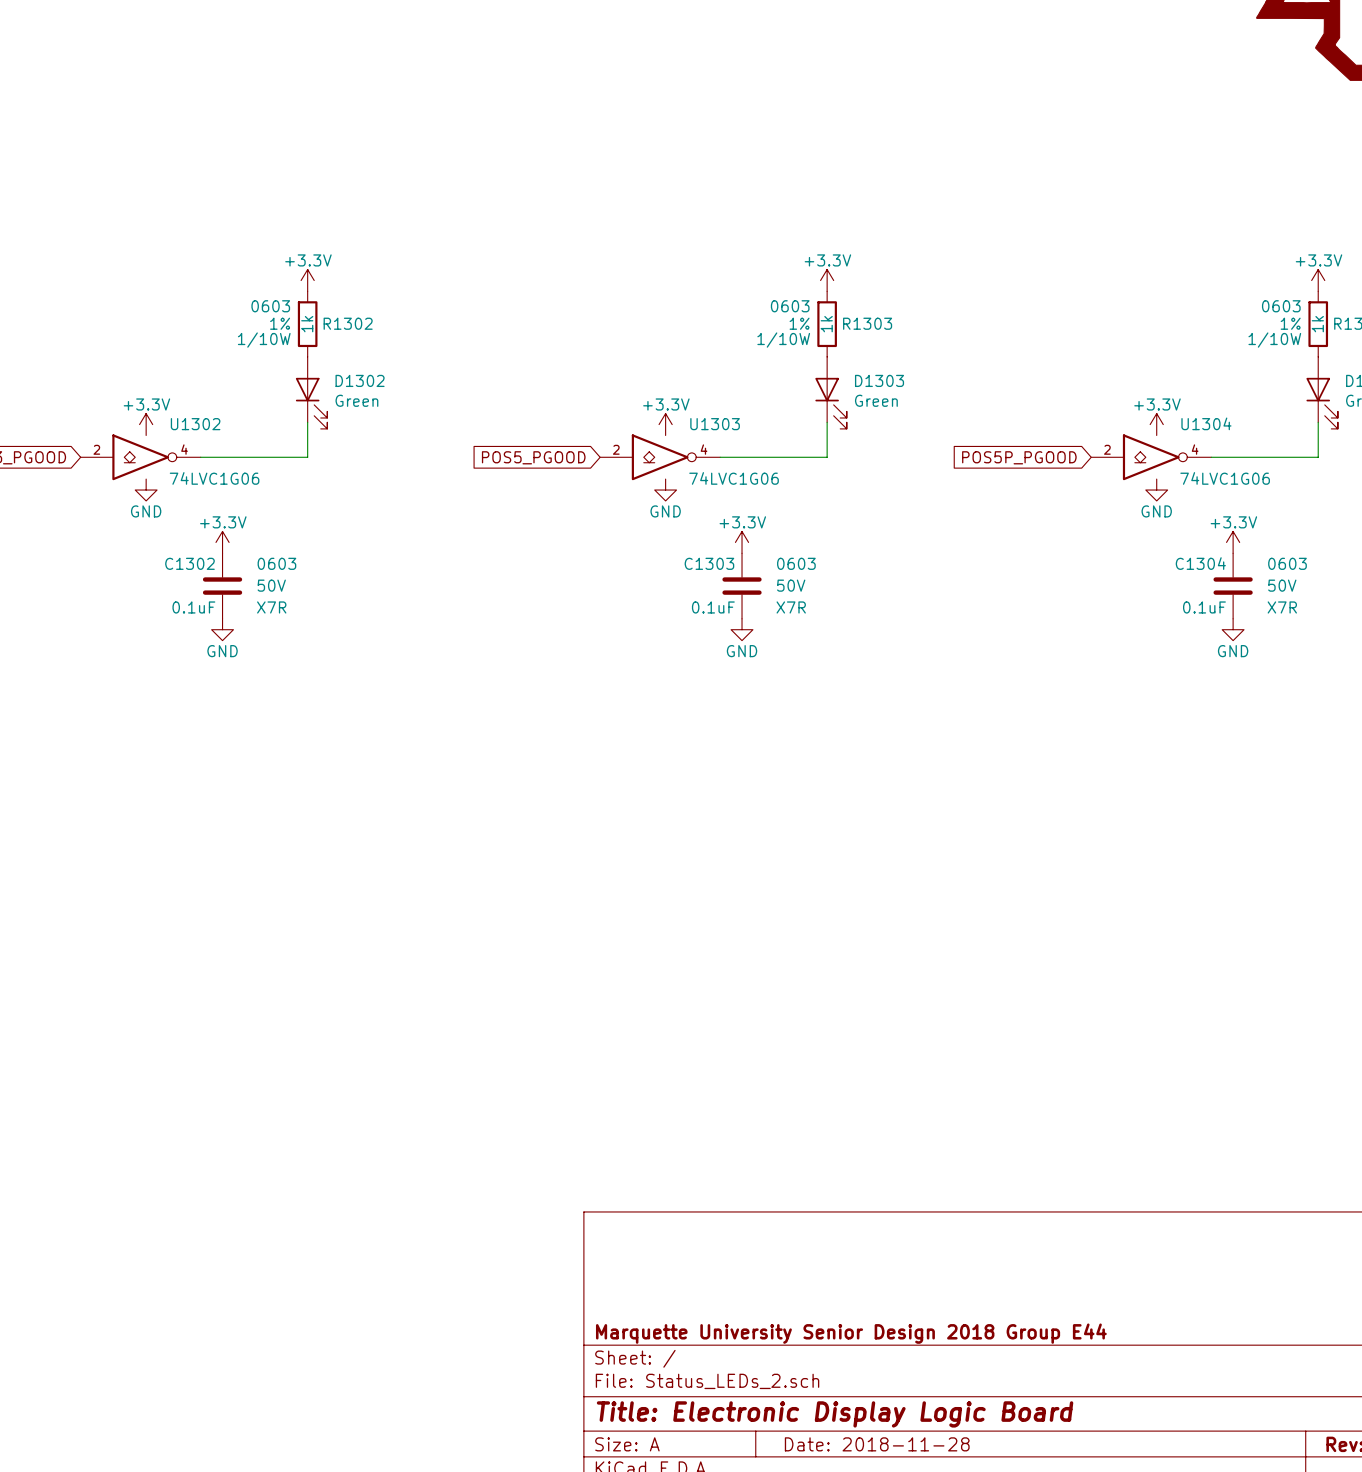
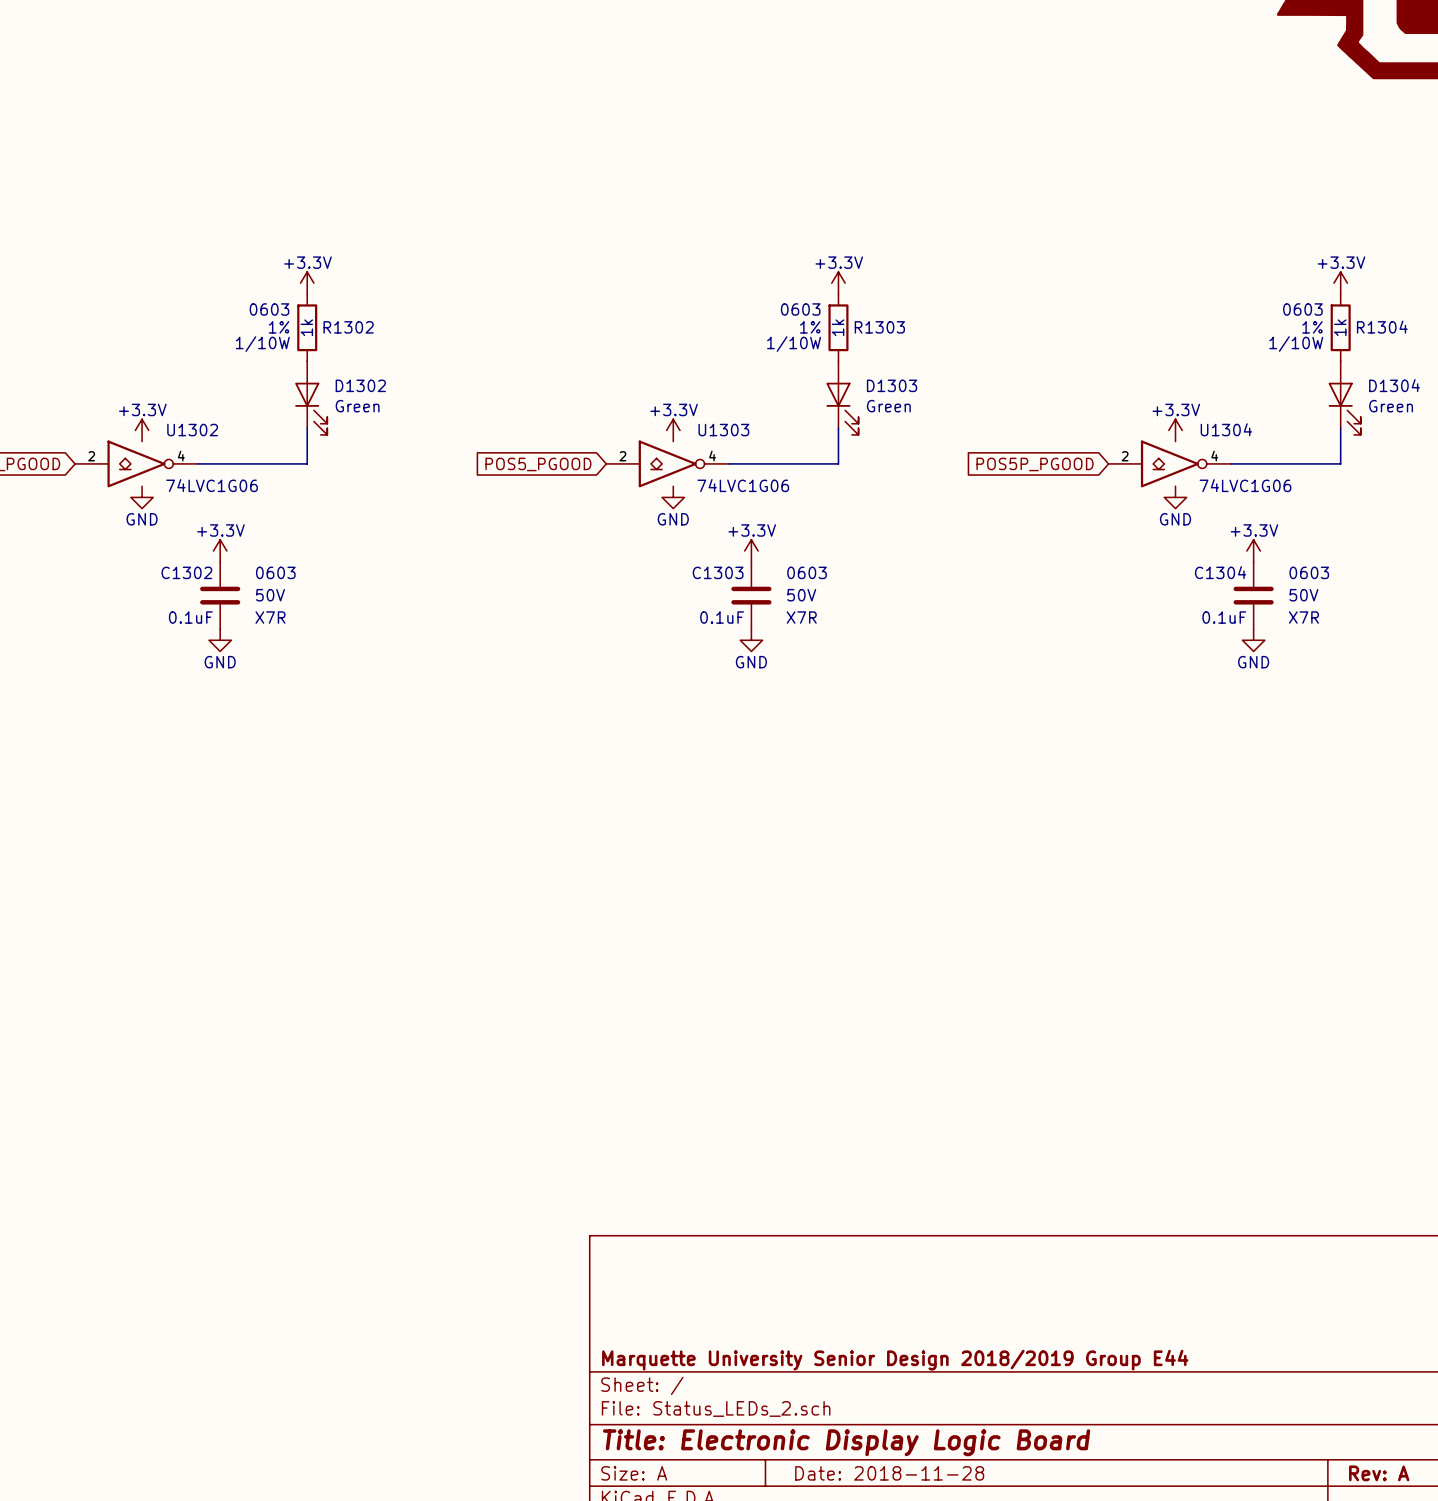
title block: Marquette University Senior Design 2018 Group E44 (851, 1333) -> Marquette University Senior Design 2018/2019 Group E44 (895, 1360)

